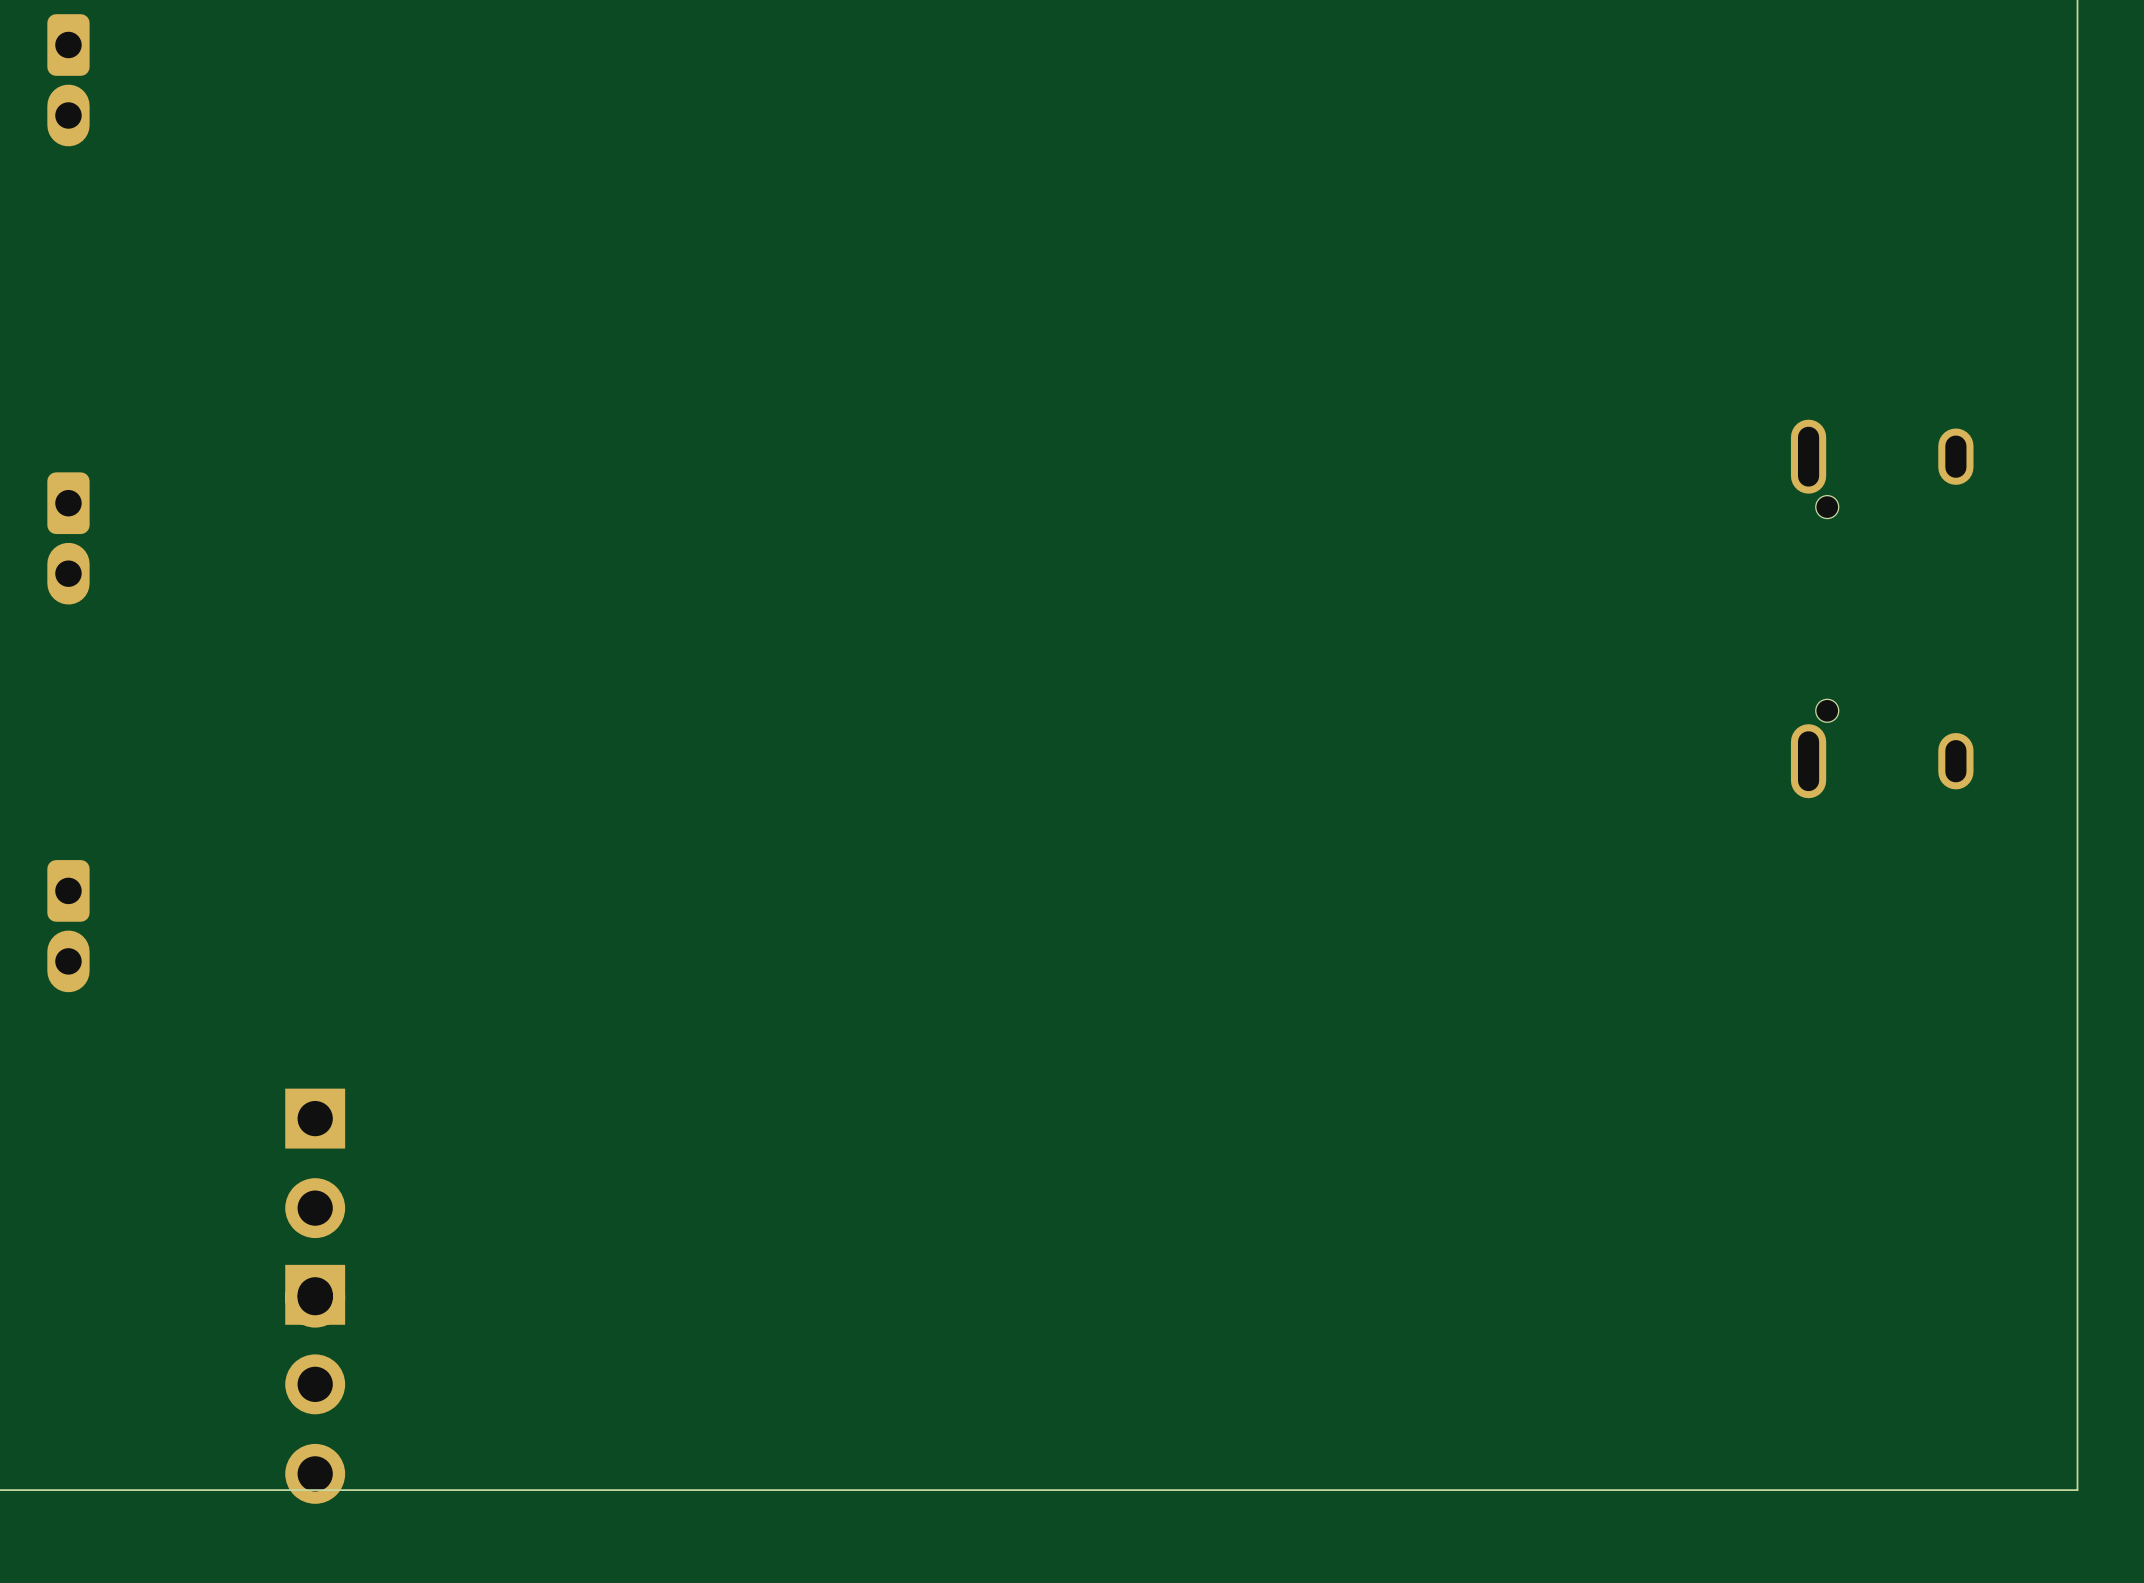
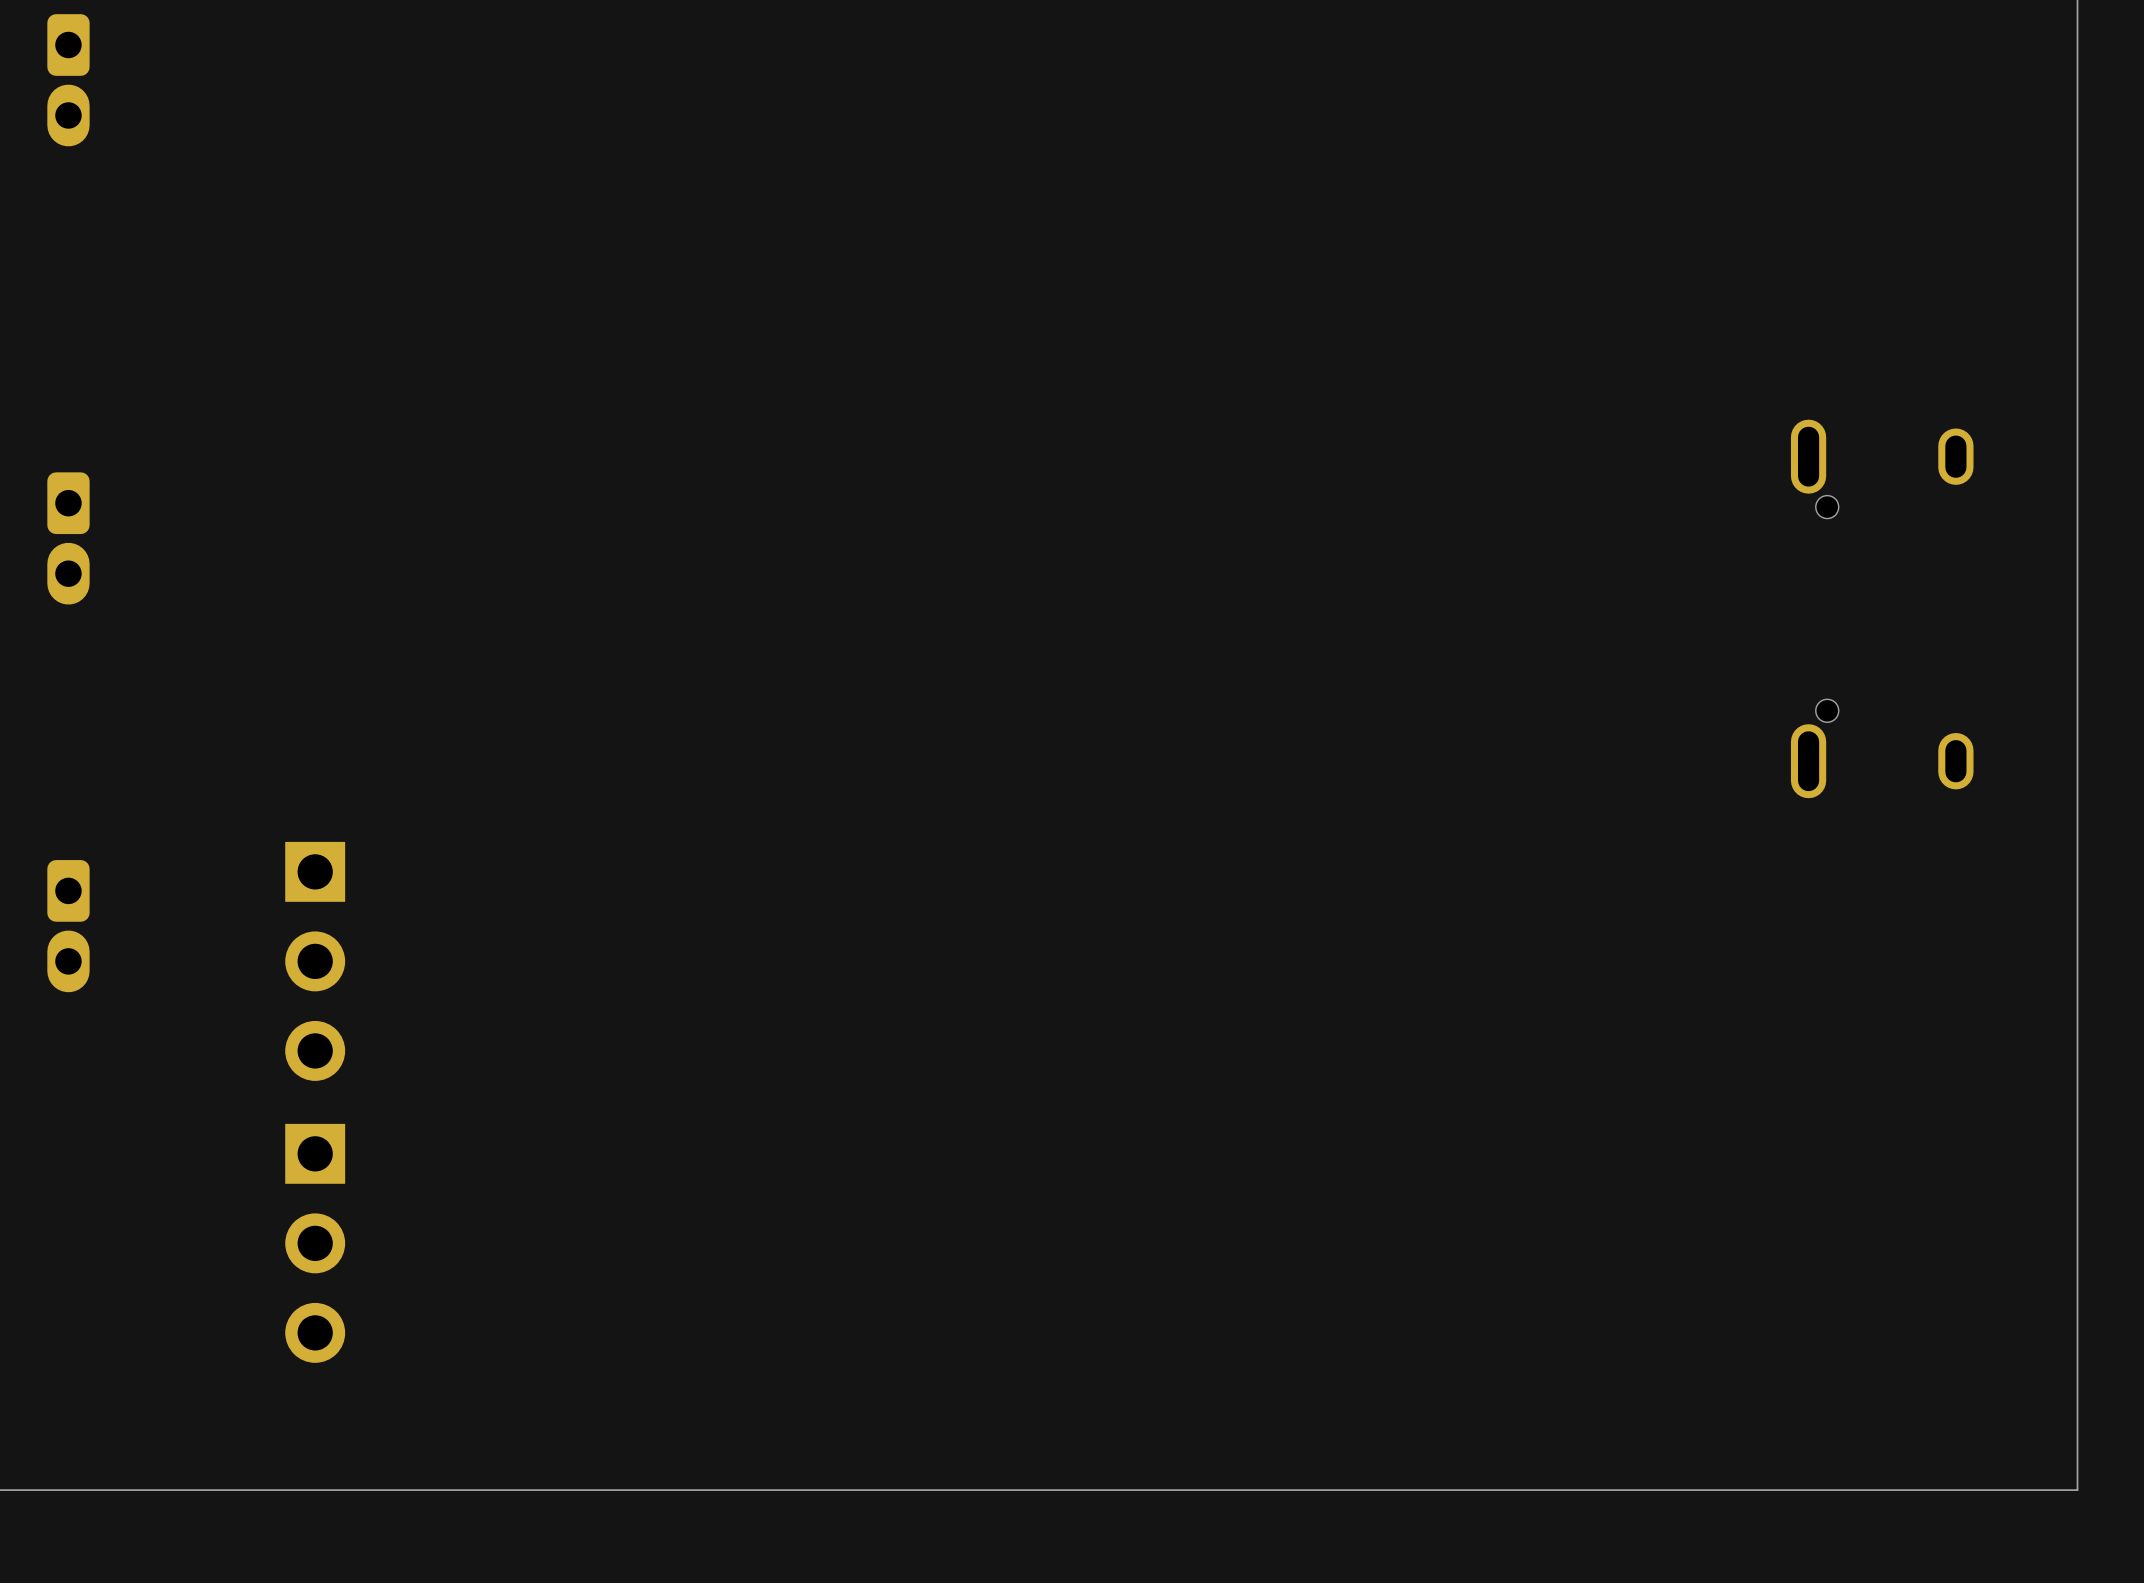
part position: (315, 1208) -> (315, 1243)
part position: (315, 1384) -> (315, 961)

